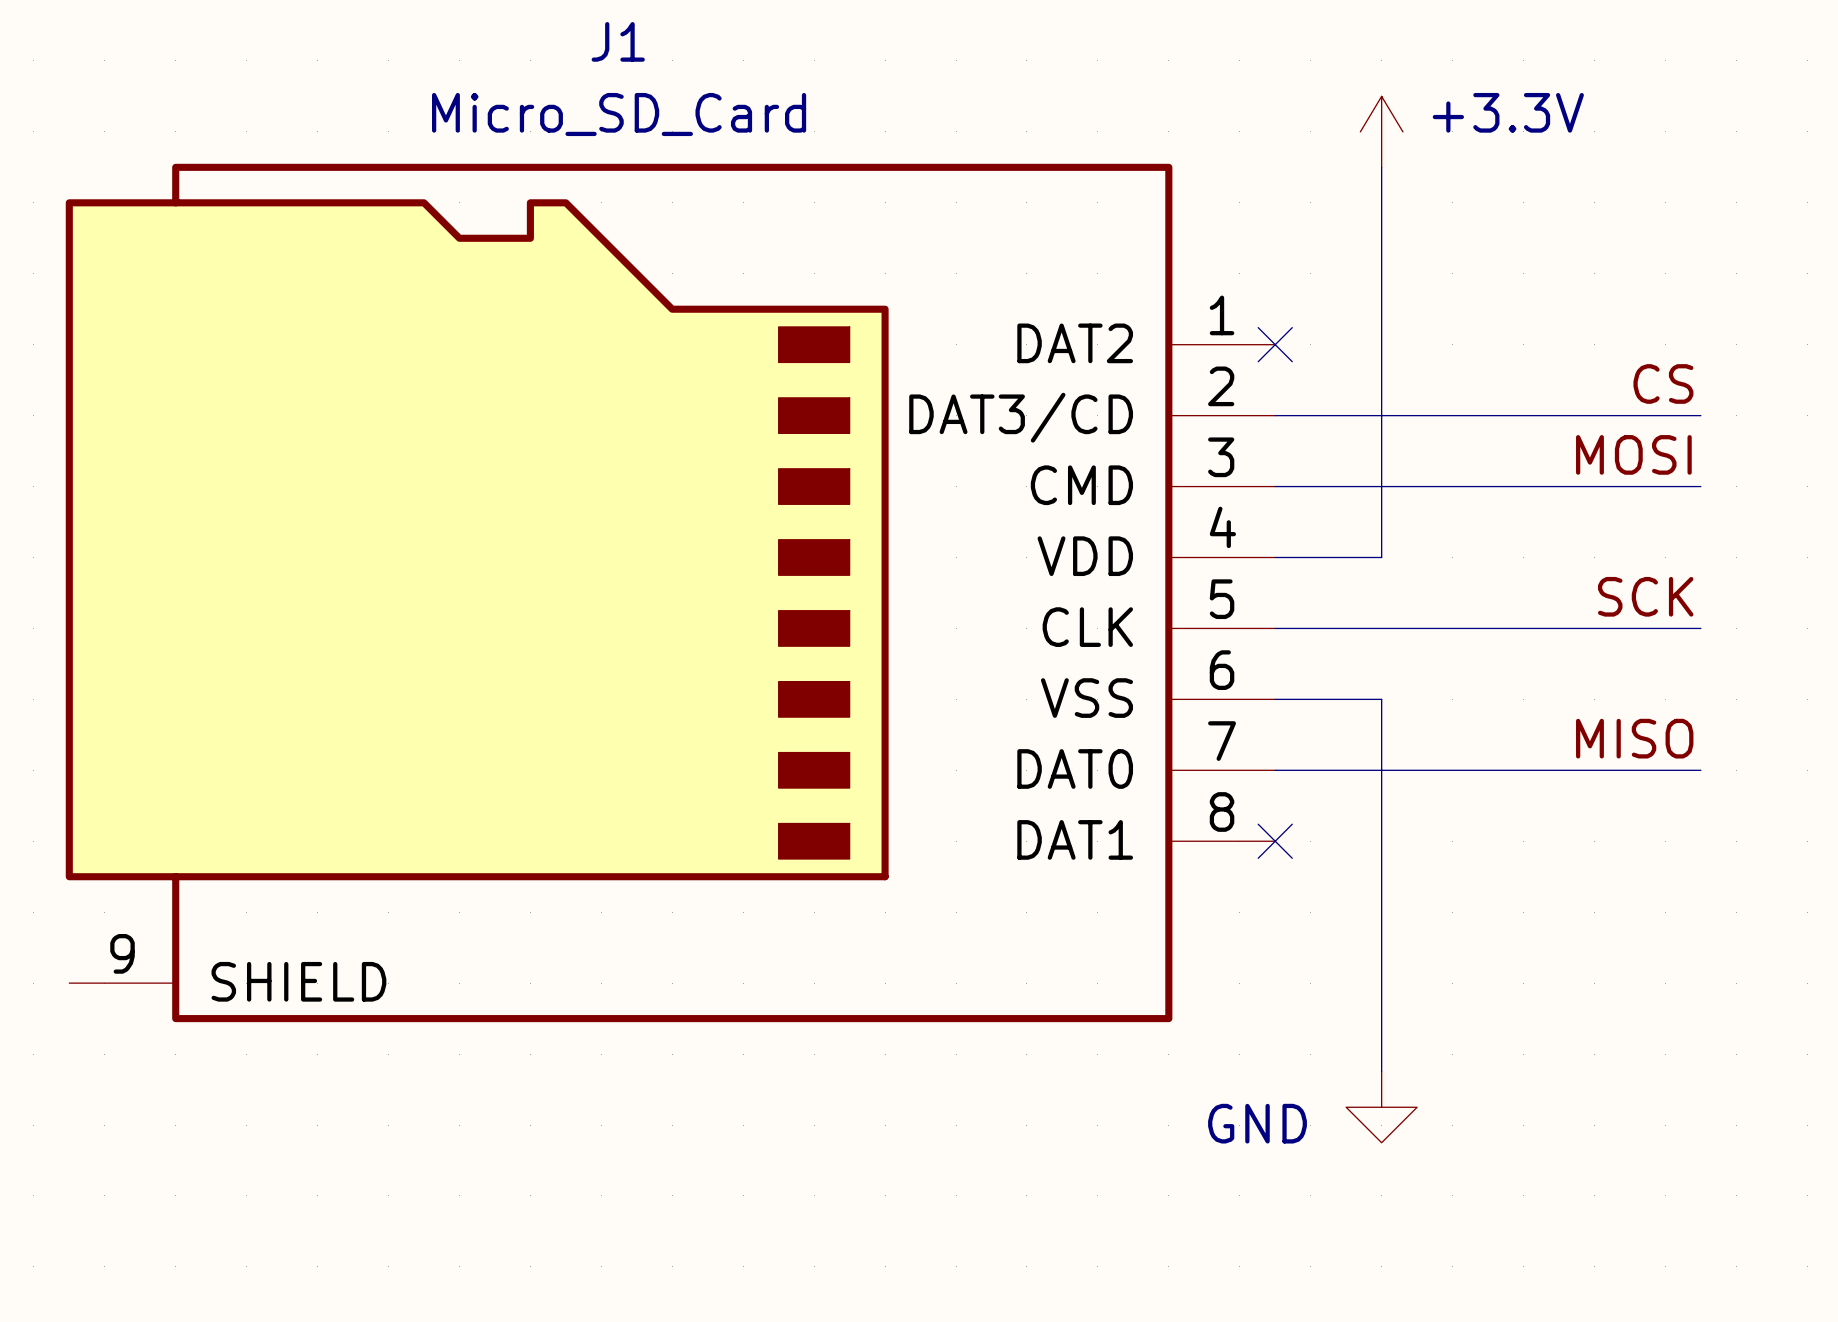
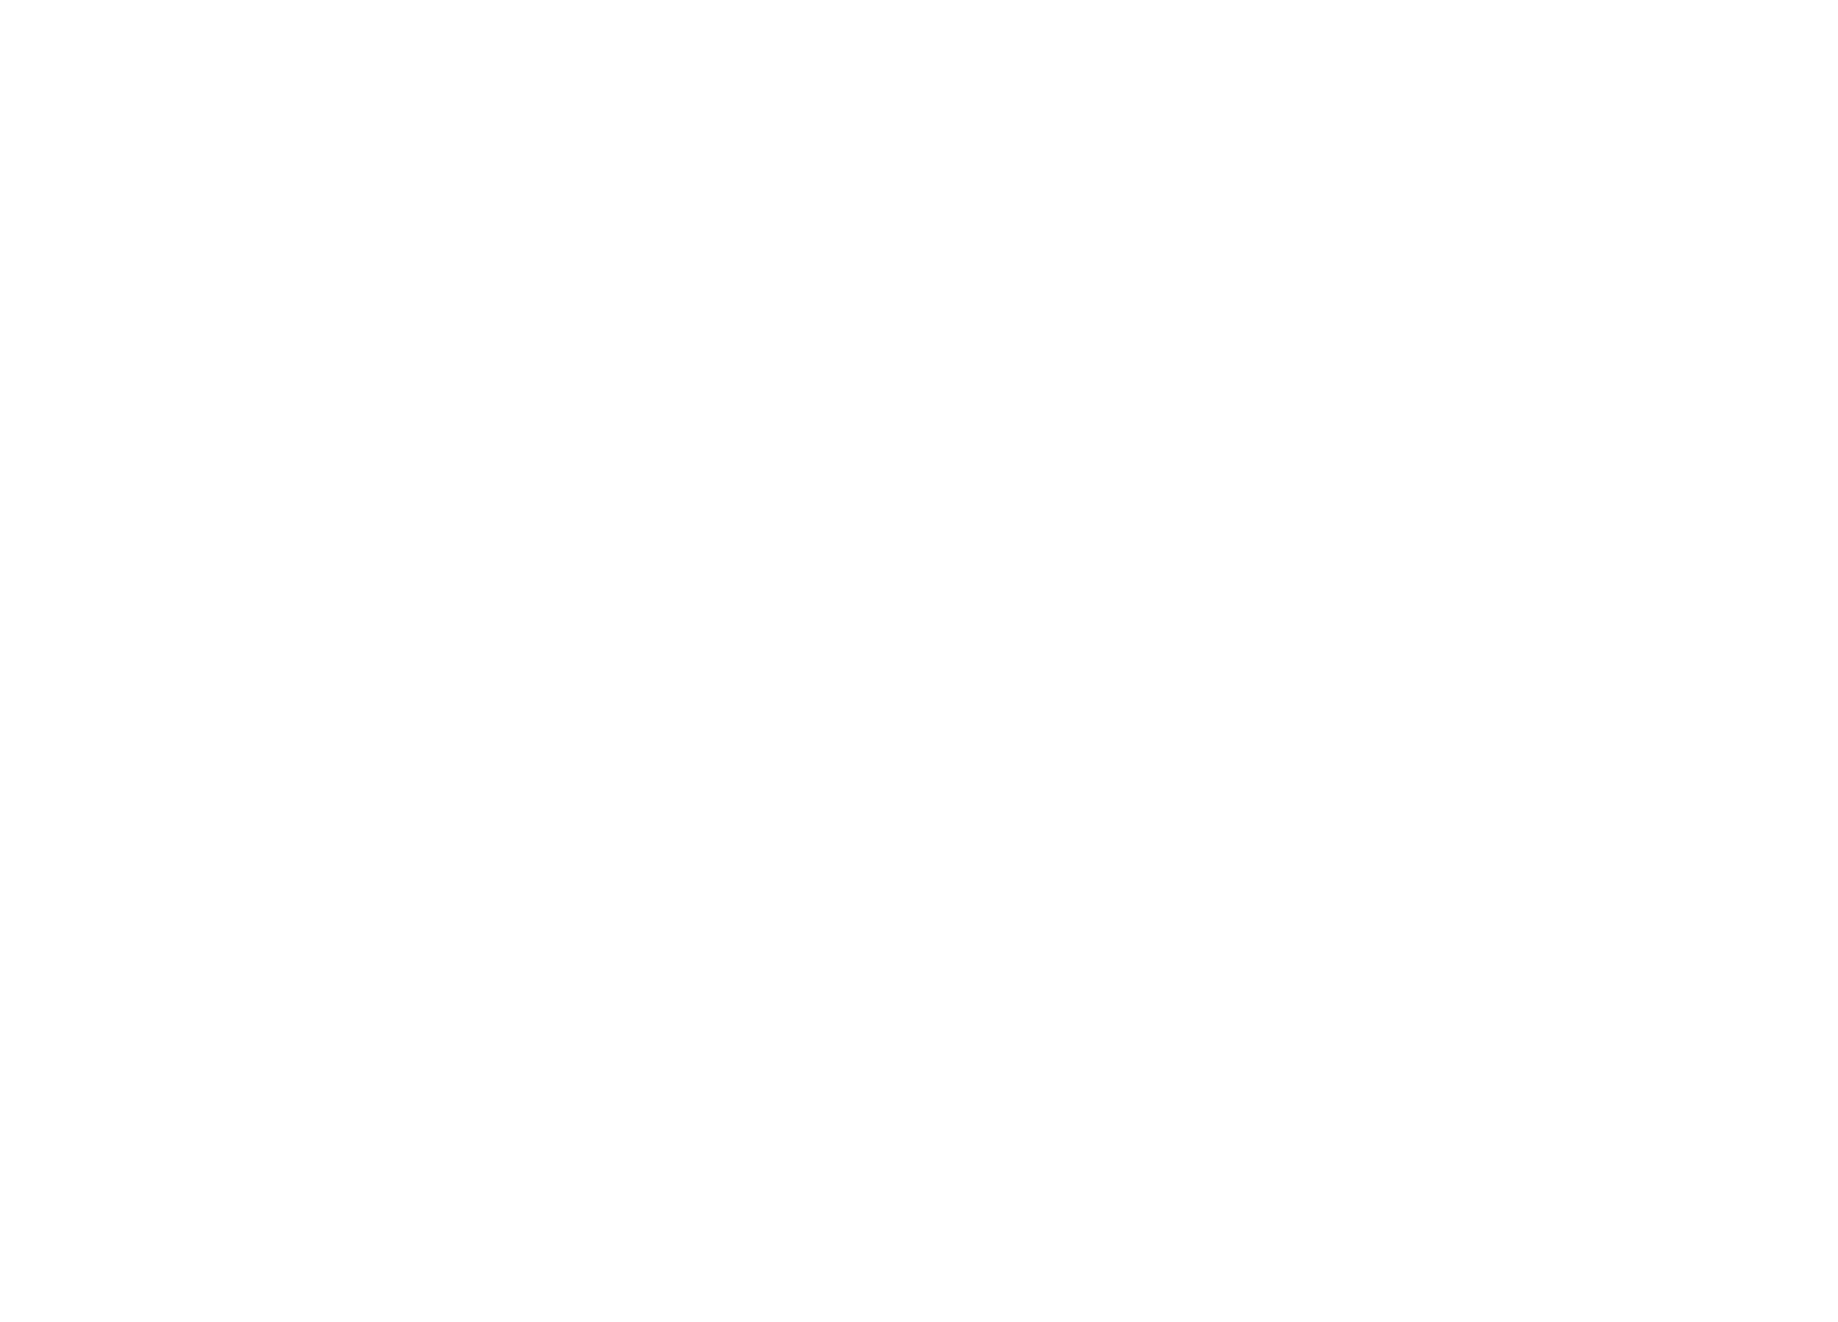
power symbol: +3.3V (1381, 131) -> none
wire: (1381, 167) (1381, 557) (1275, 557) -> none
no-connect mark: (1275, 344) -> none
label: CS (1663, 383) -> none
wire: (1275, 415) (1700, 415) -> none
label: MOSI (1633, 454) -> none
wire: (1275, 486) (1700, 486) -> none
J1: Micro_SD_Card (670, 592) -> none
label: SCK (1645, 596) -> none
wire: (1275, 628) (1700, 628) -> none
wire: (1275, 699) (1381, 699) (1381, 1071) -> none
label: MISO (1634, 738) -> none
wire: (1275, 770) (1700, 770) -> none
no-connect mark: (1275, 841) -> none
power symbol: GND (1381, 1107) -> none

